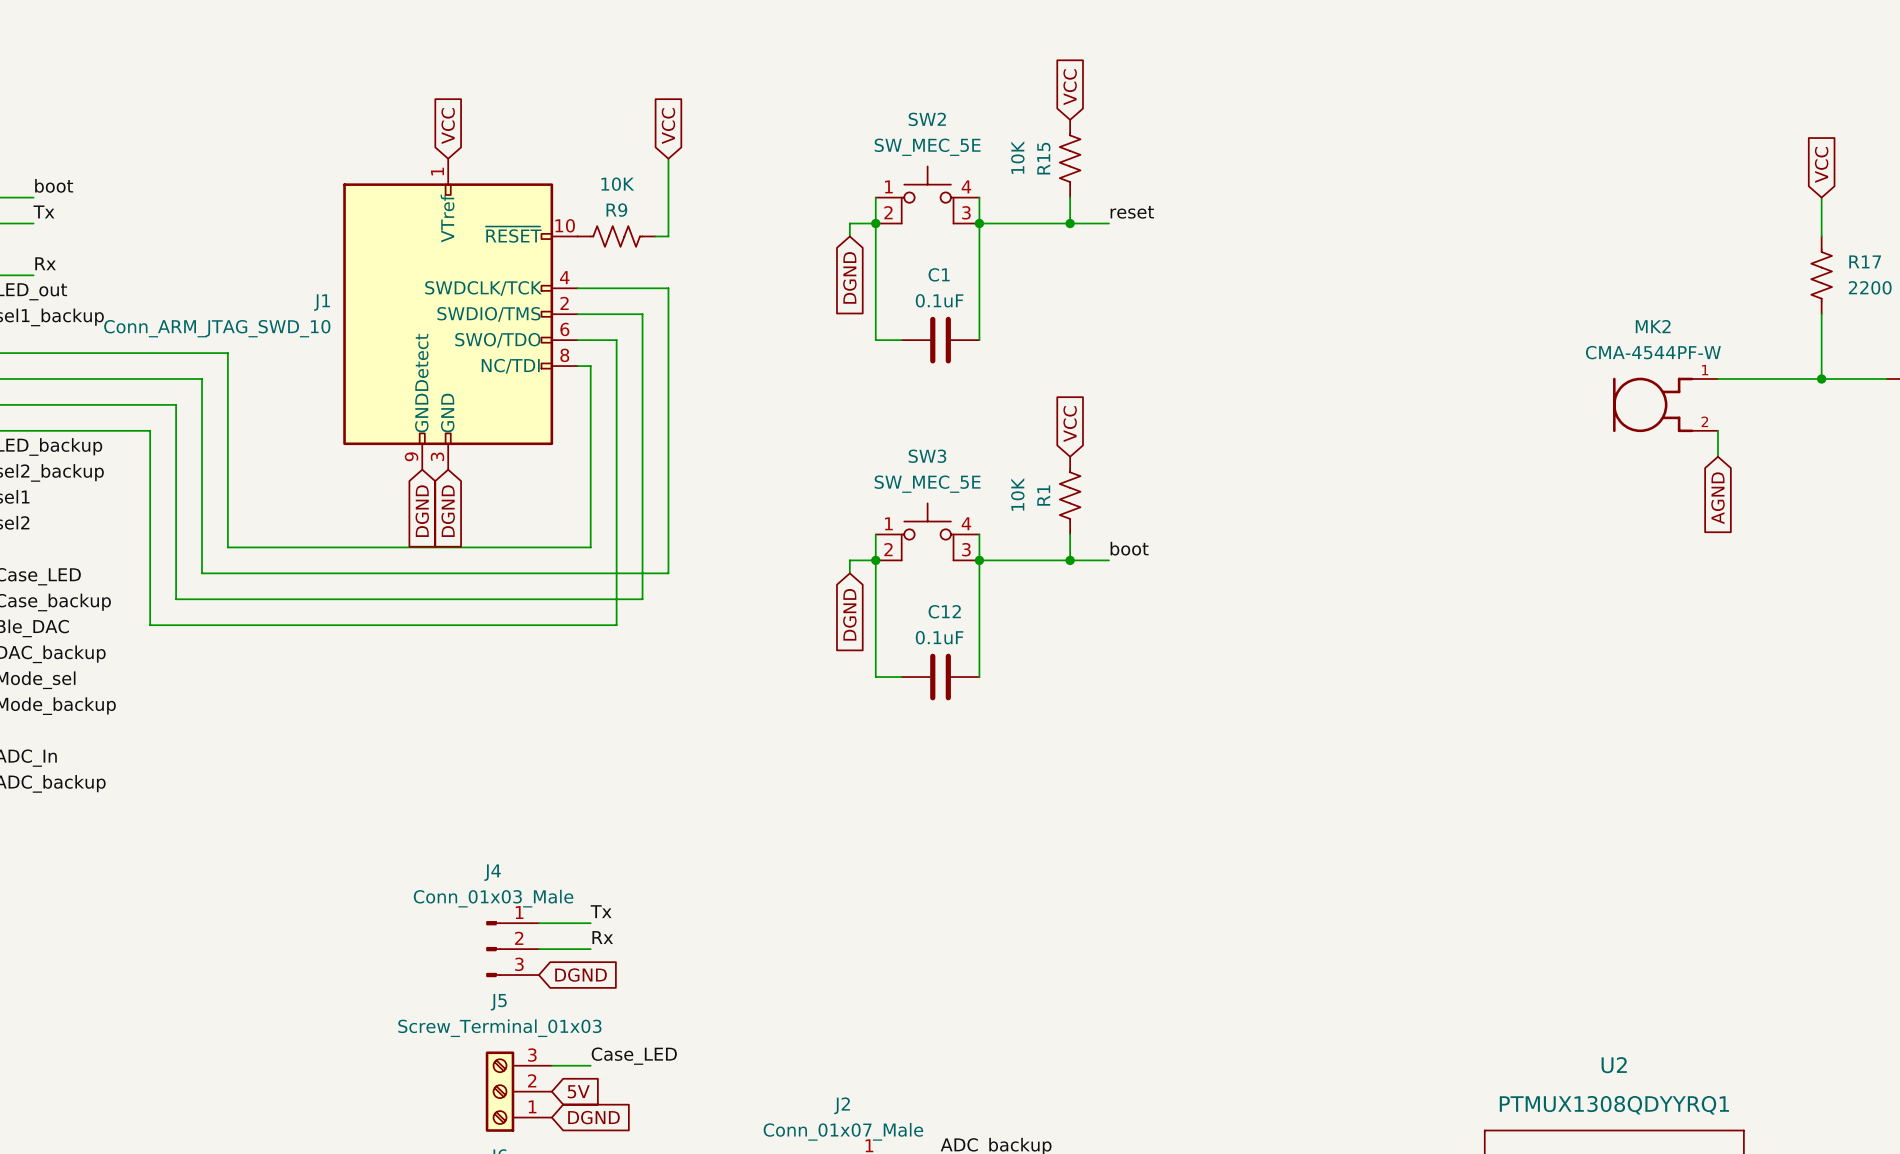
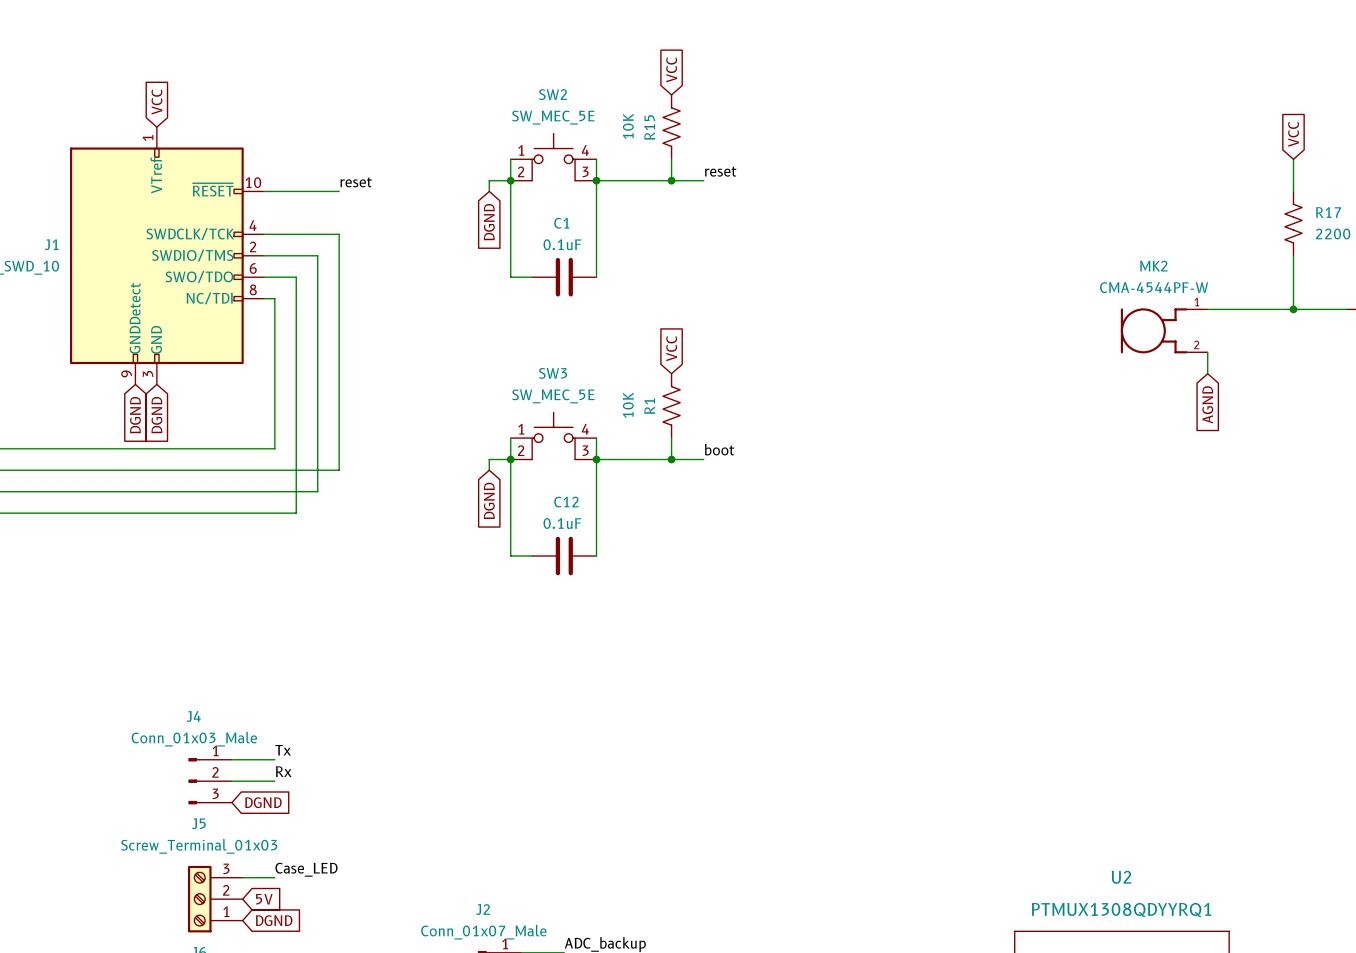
global label: VCC (668, 126) -> none
wire: (668, 158) (668, 236) -> none
label: none -> reset (356, 182)
R9: 10K (616, 236) -> none

